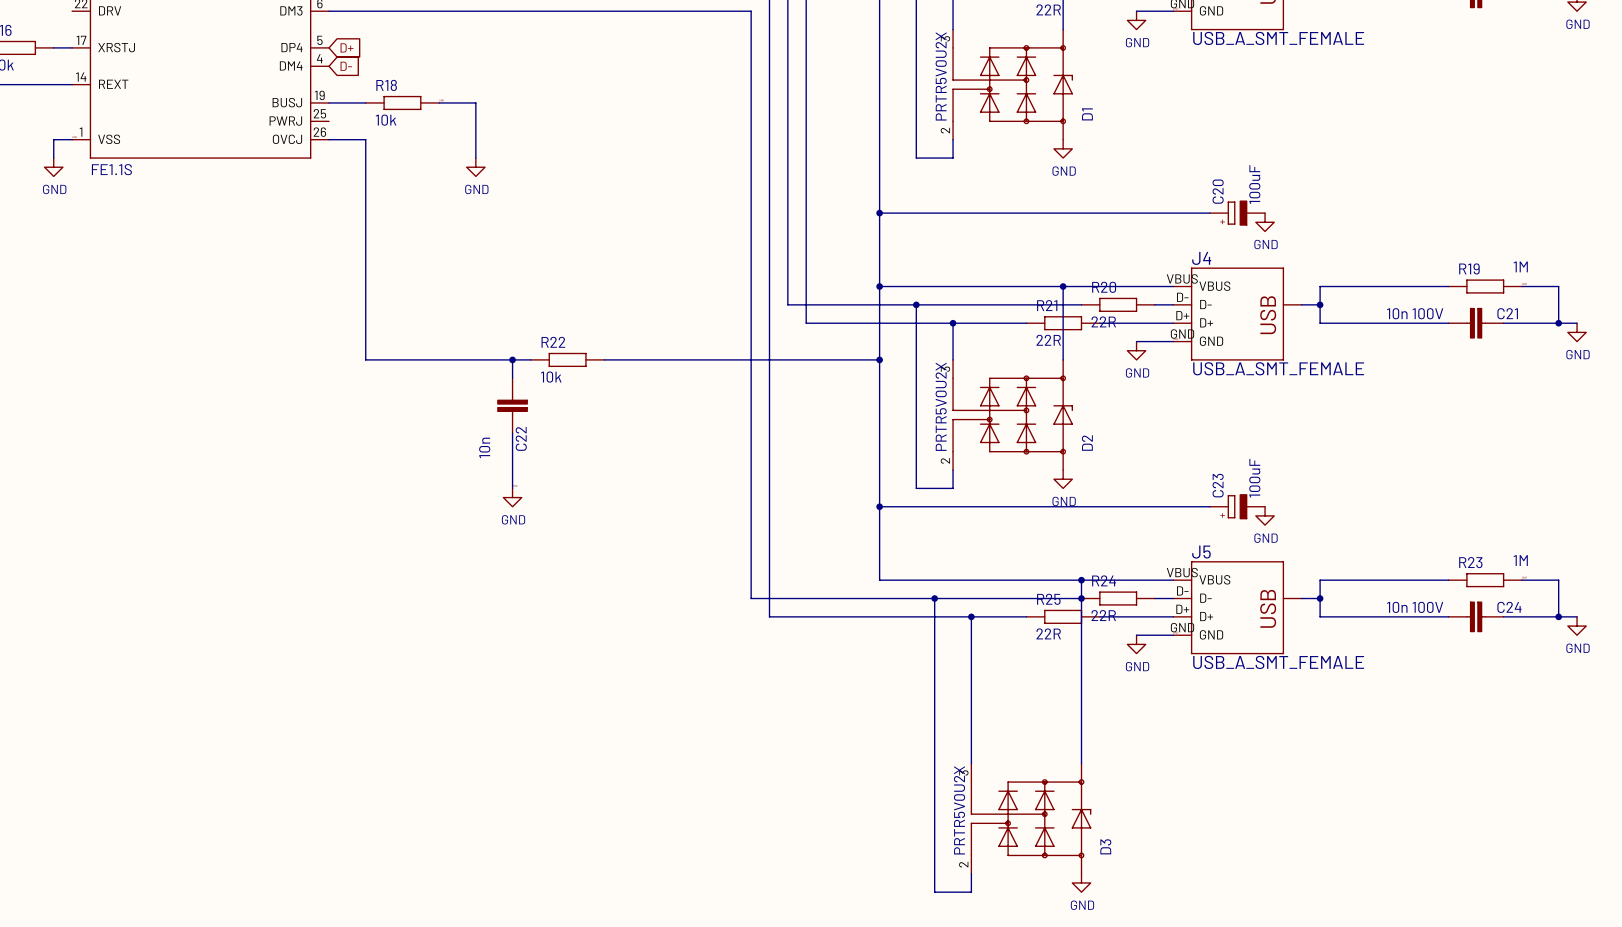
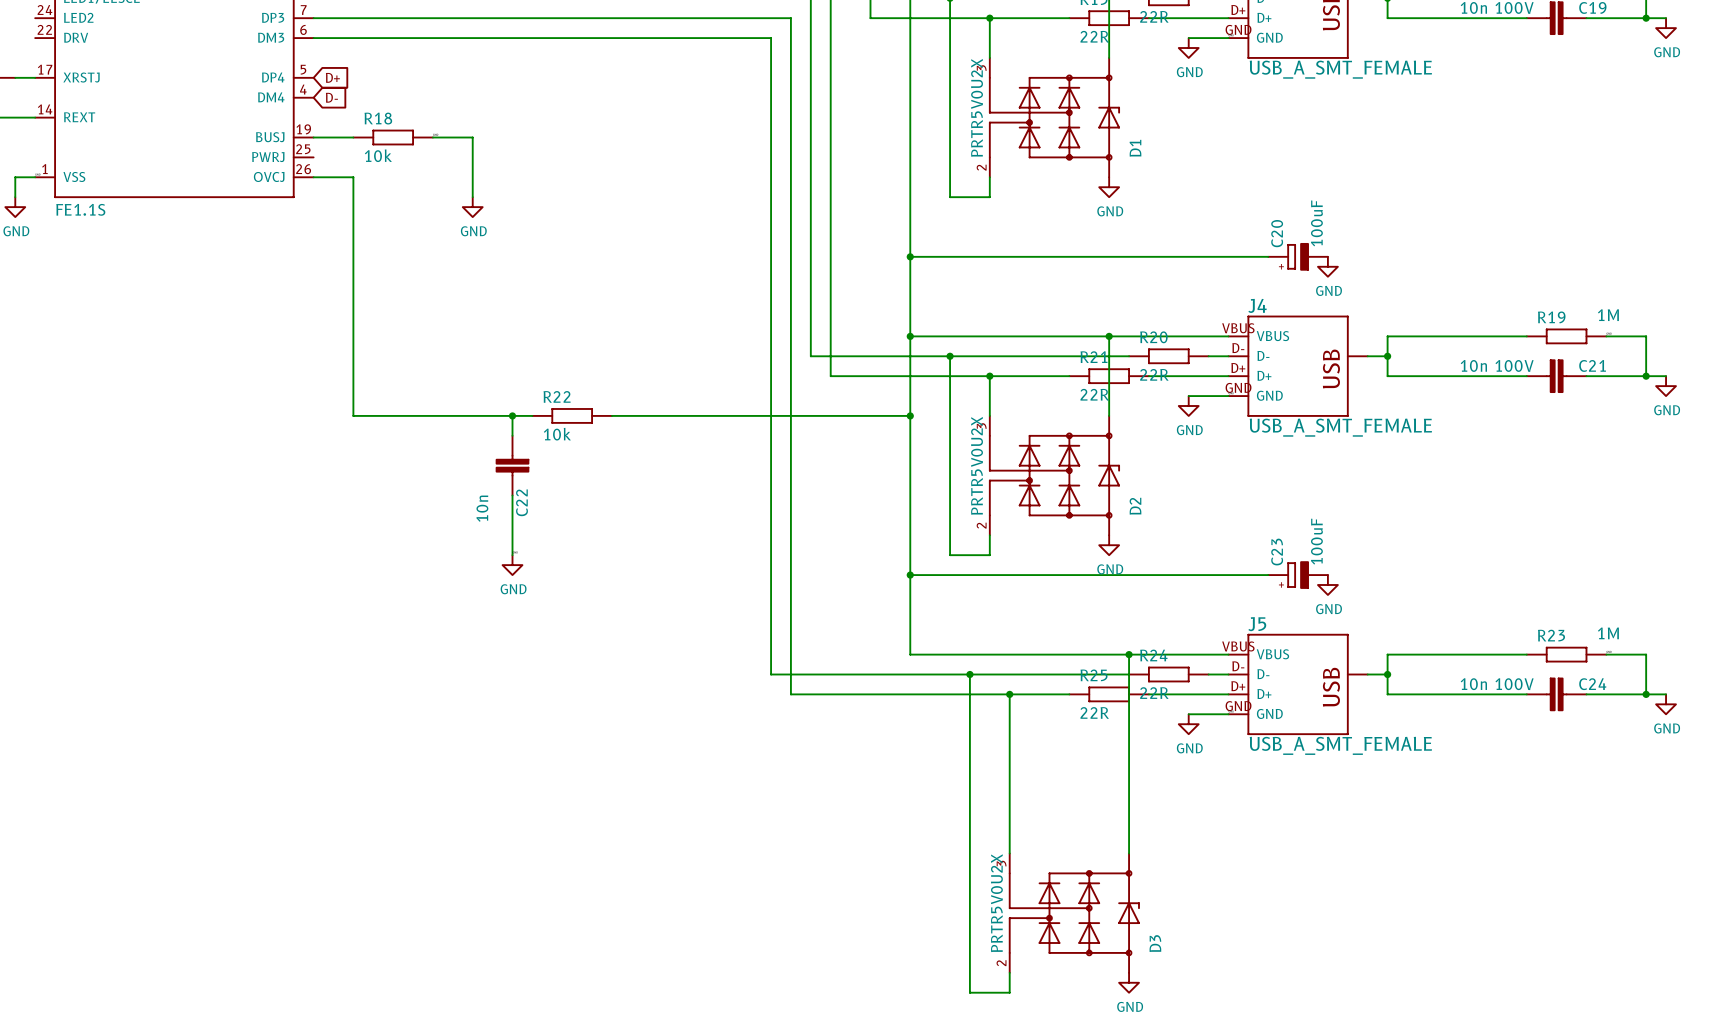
junction: (1081, 598) -> none

